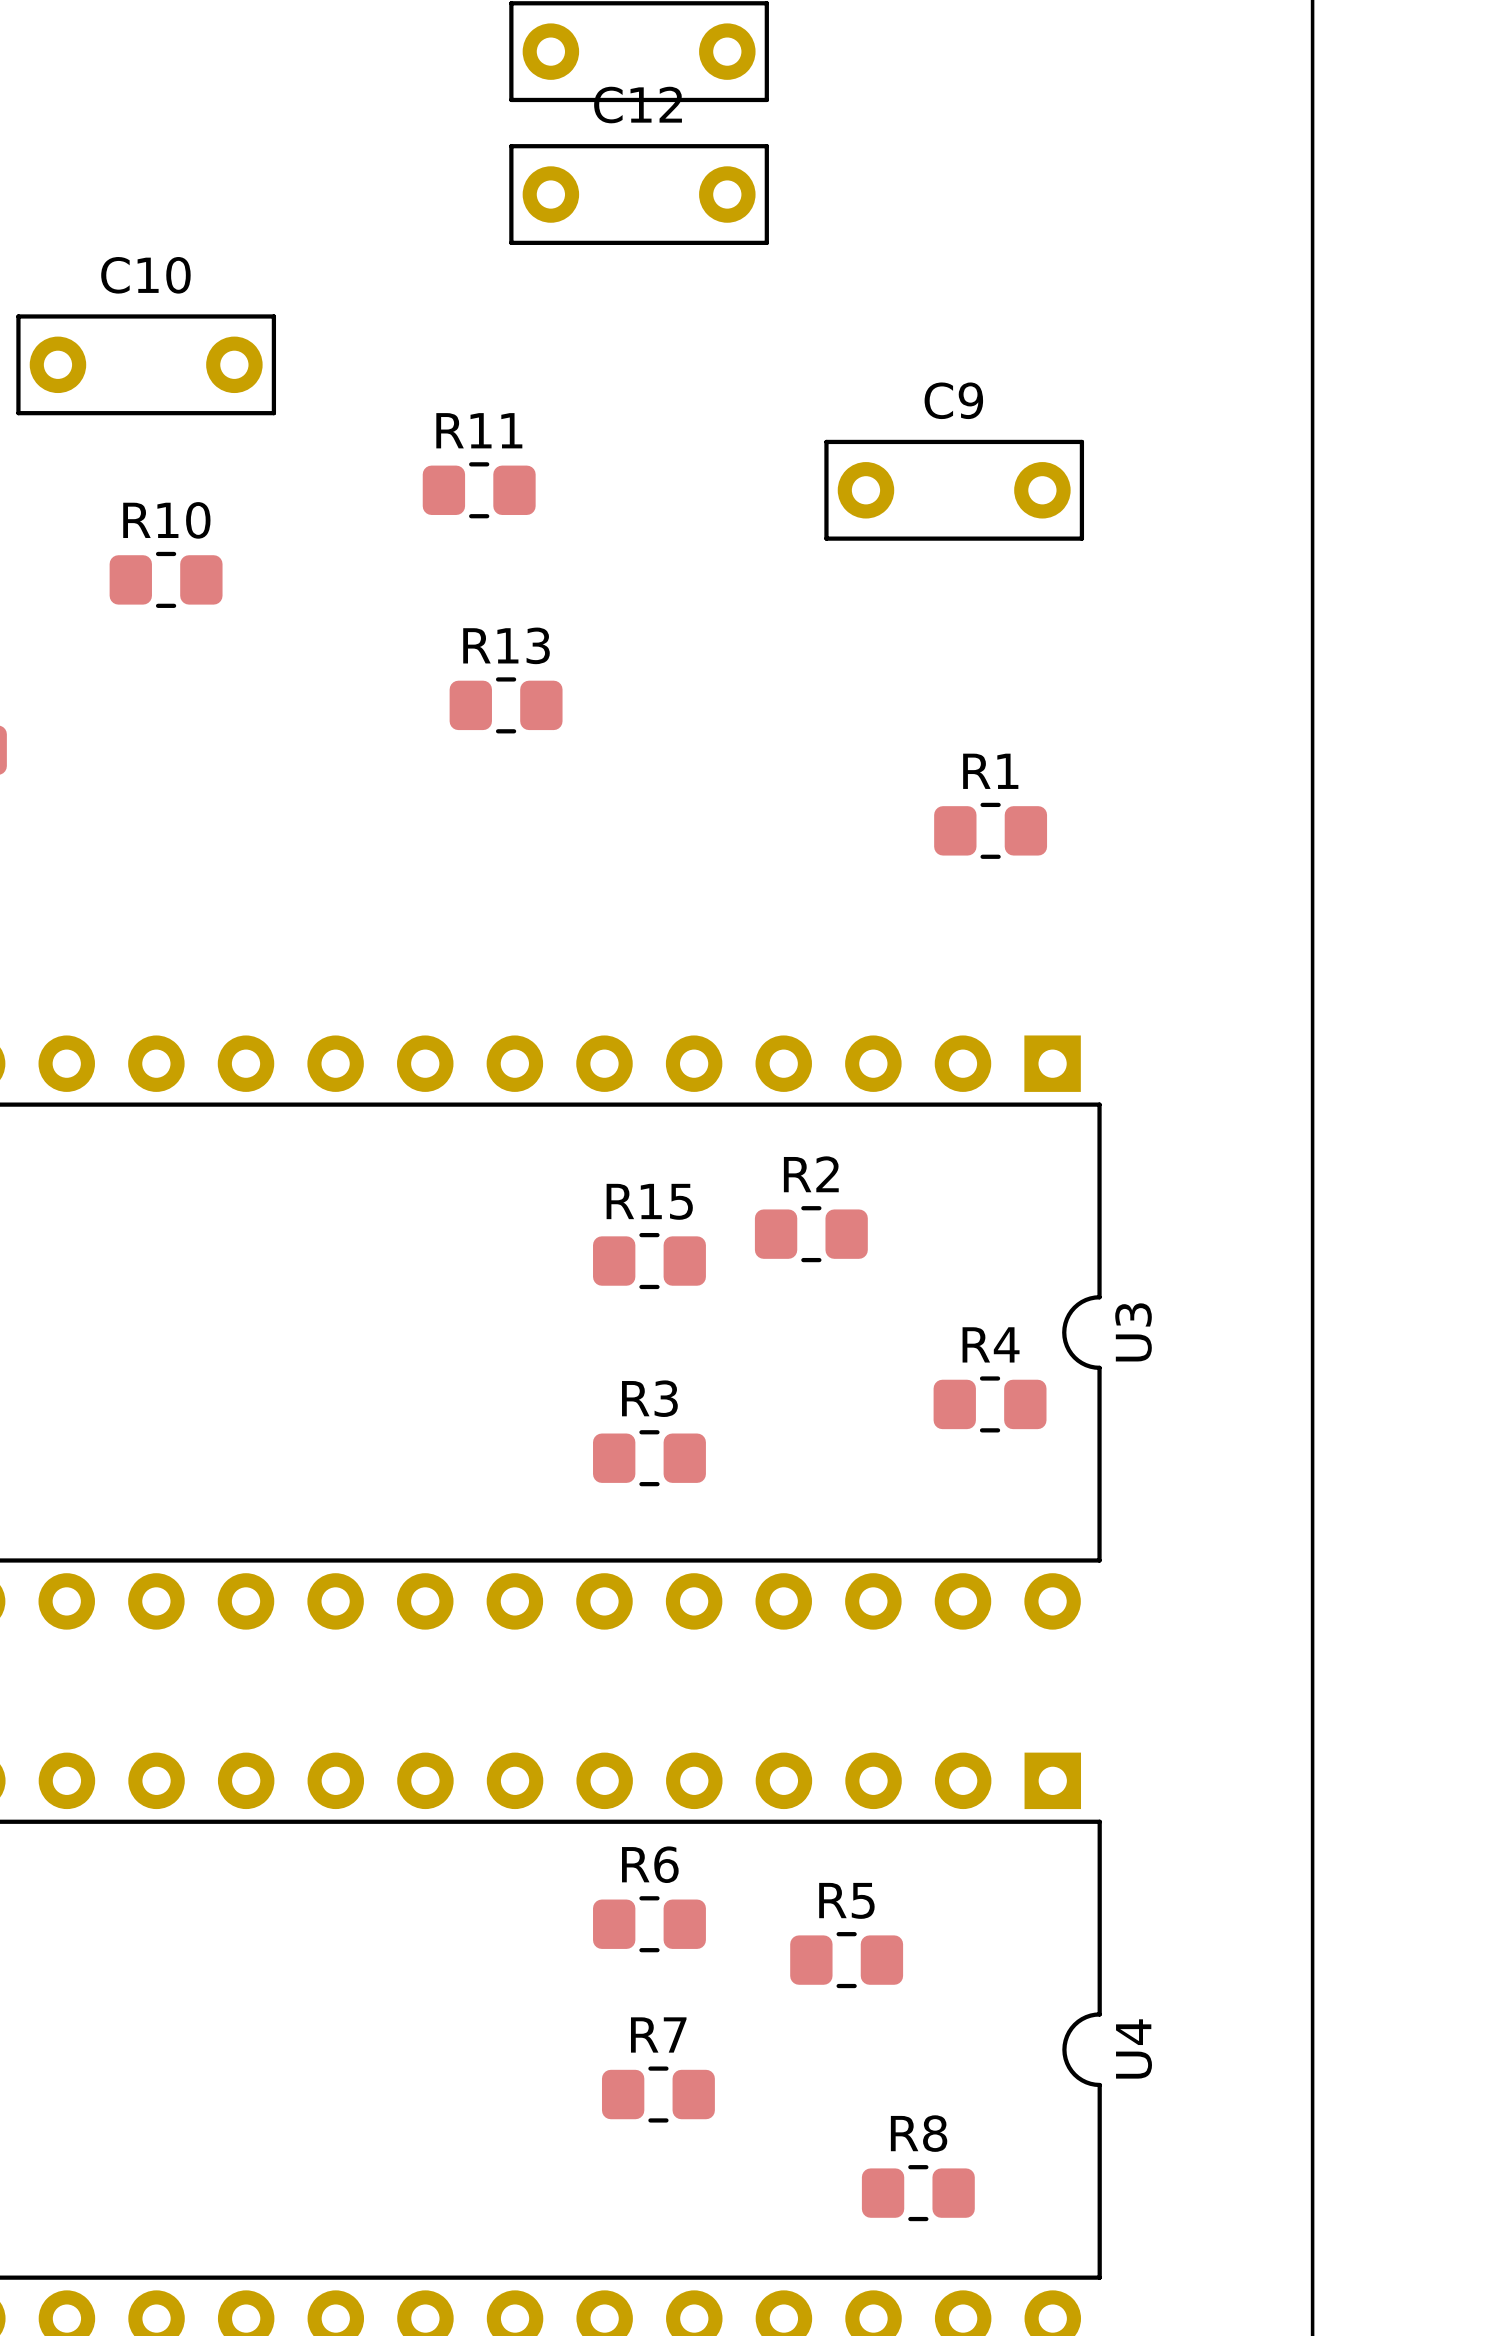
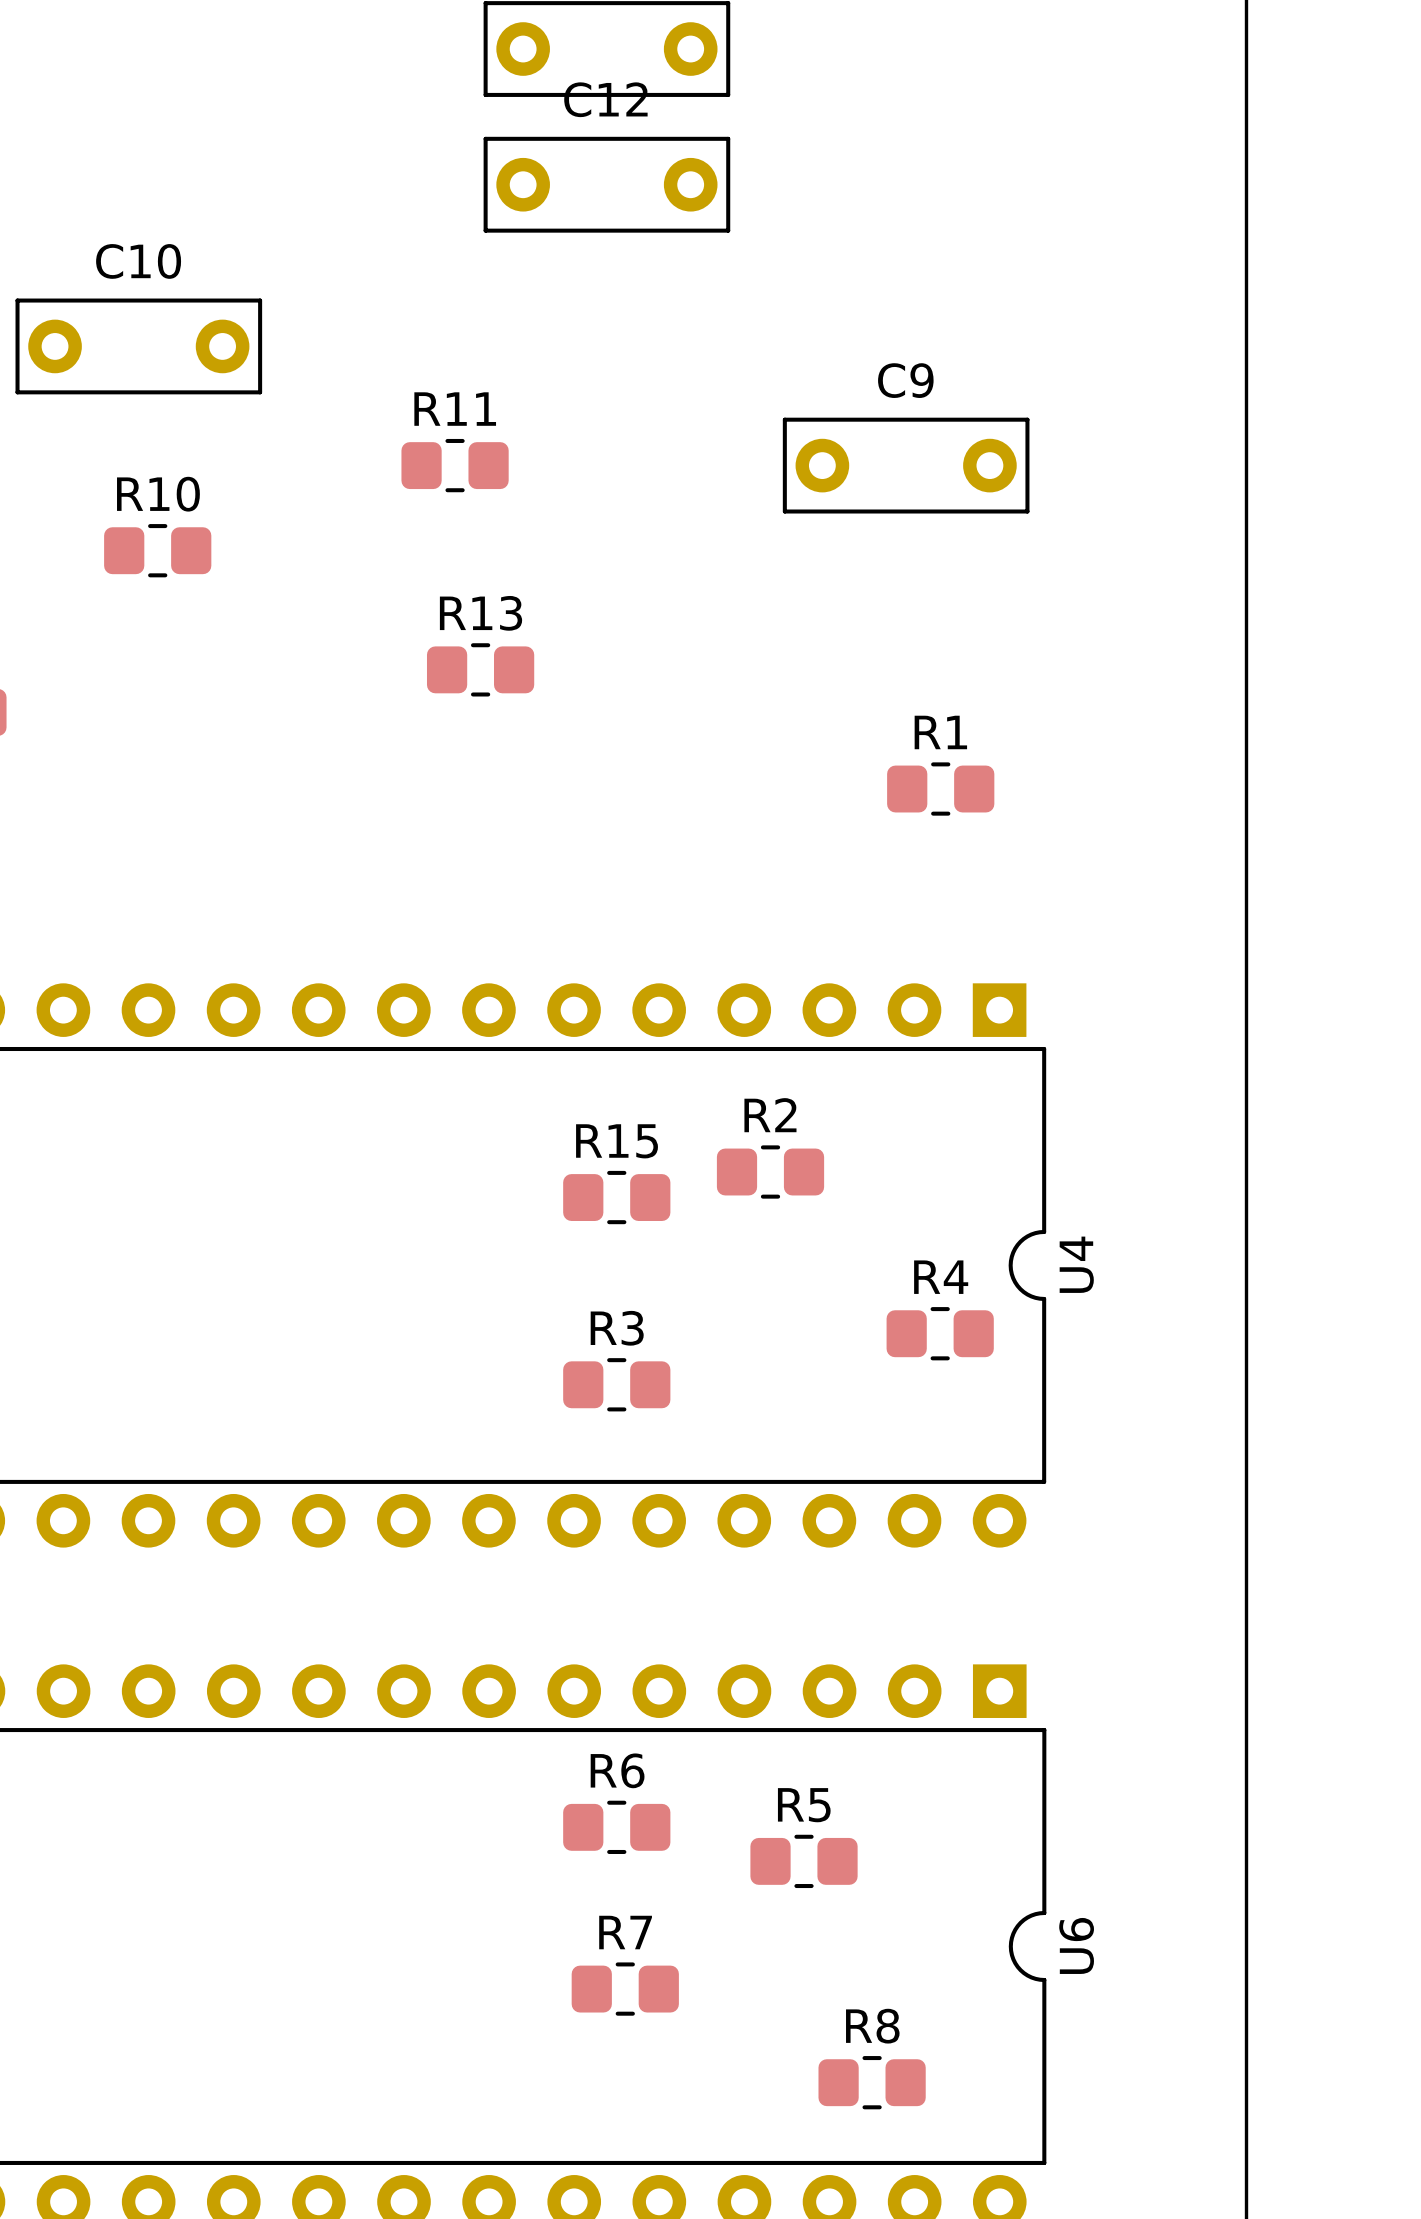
U3 name: U3 (1133, 1332) -> U4 (1076, 1264)
U4 name: U4 (1134, 2048) -> U6 (1076, 1945)

